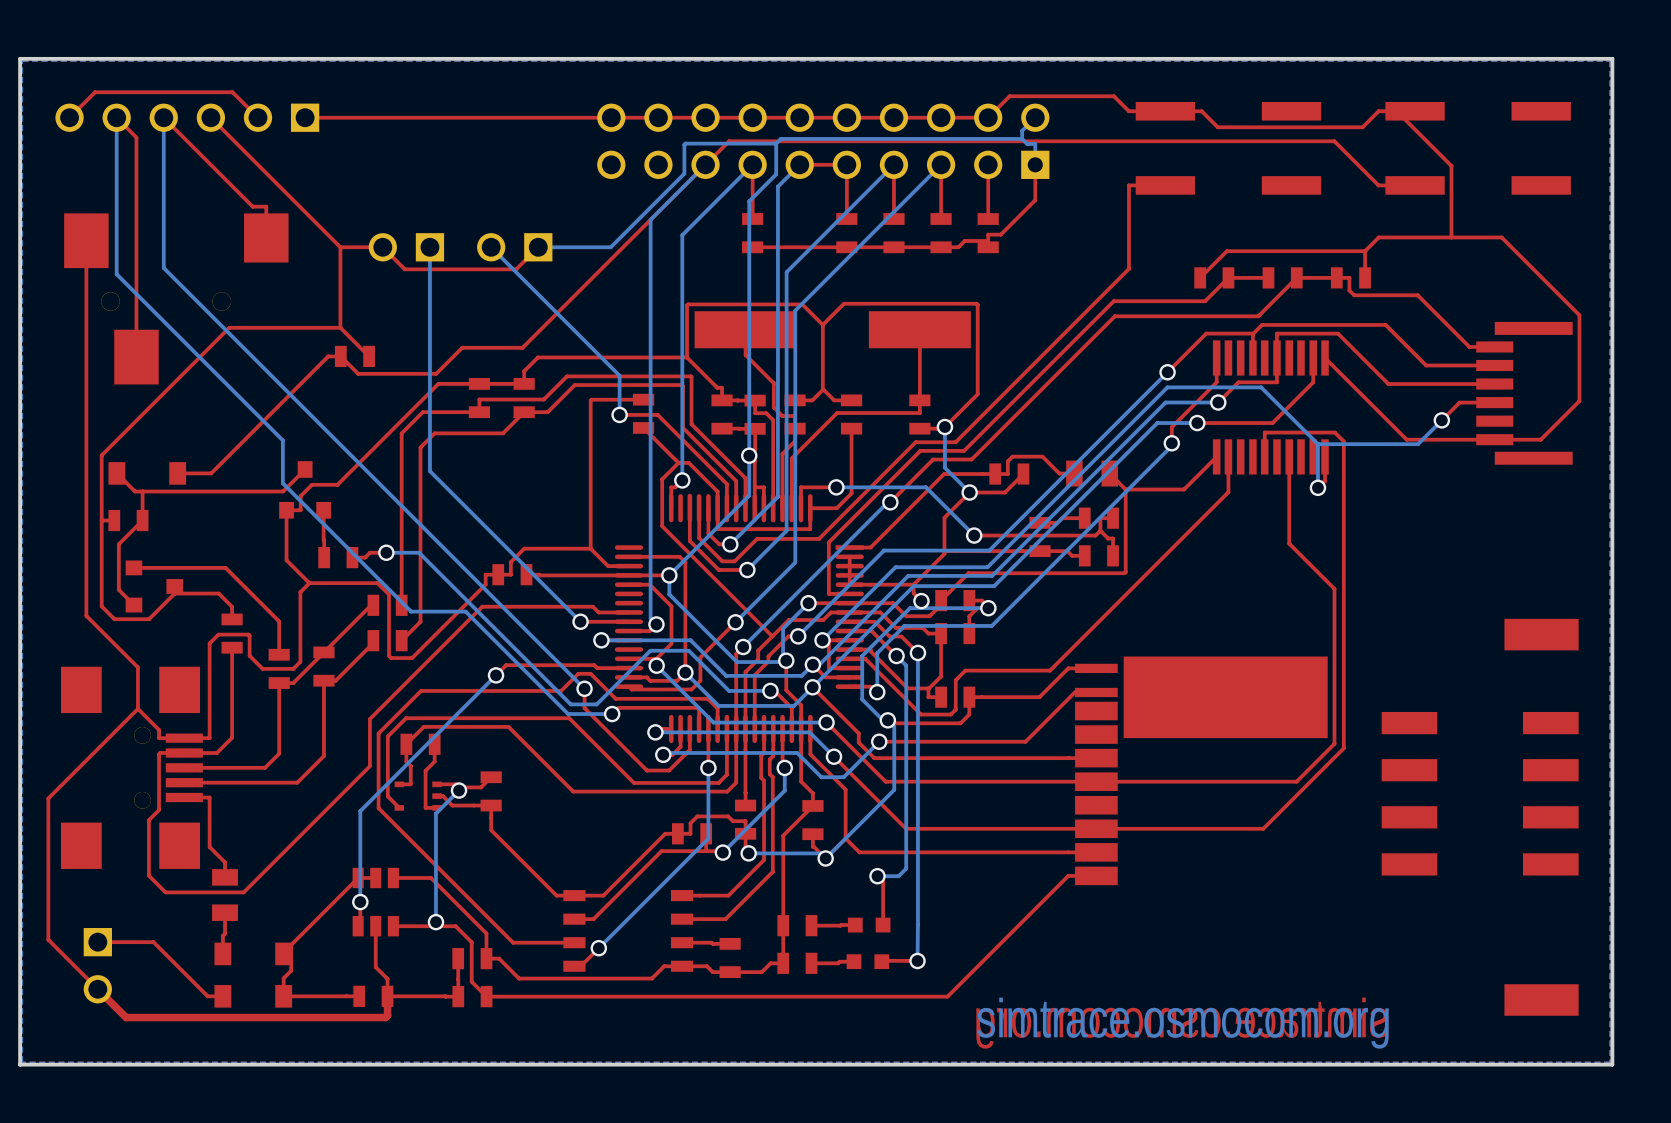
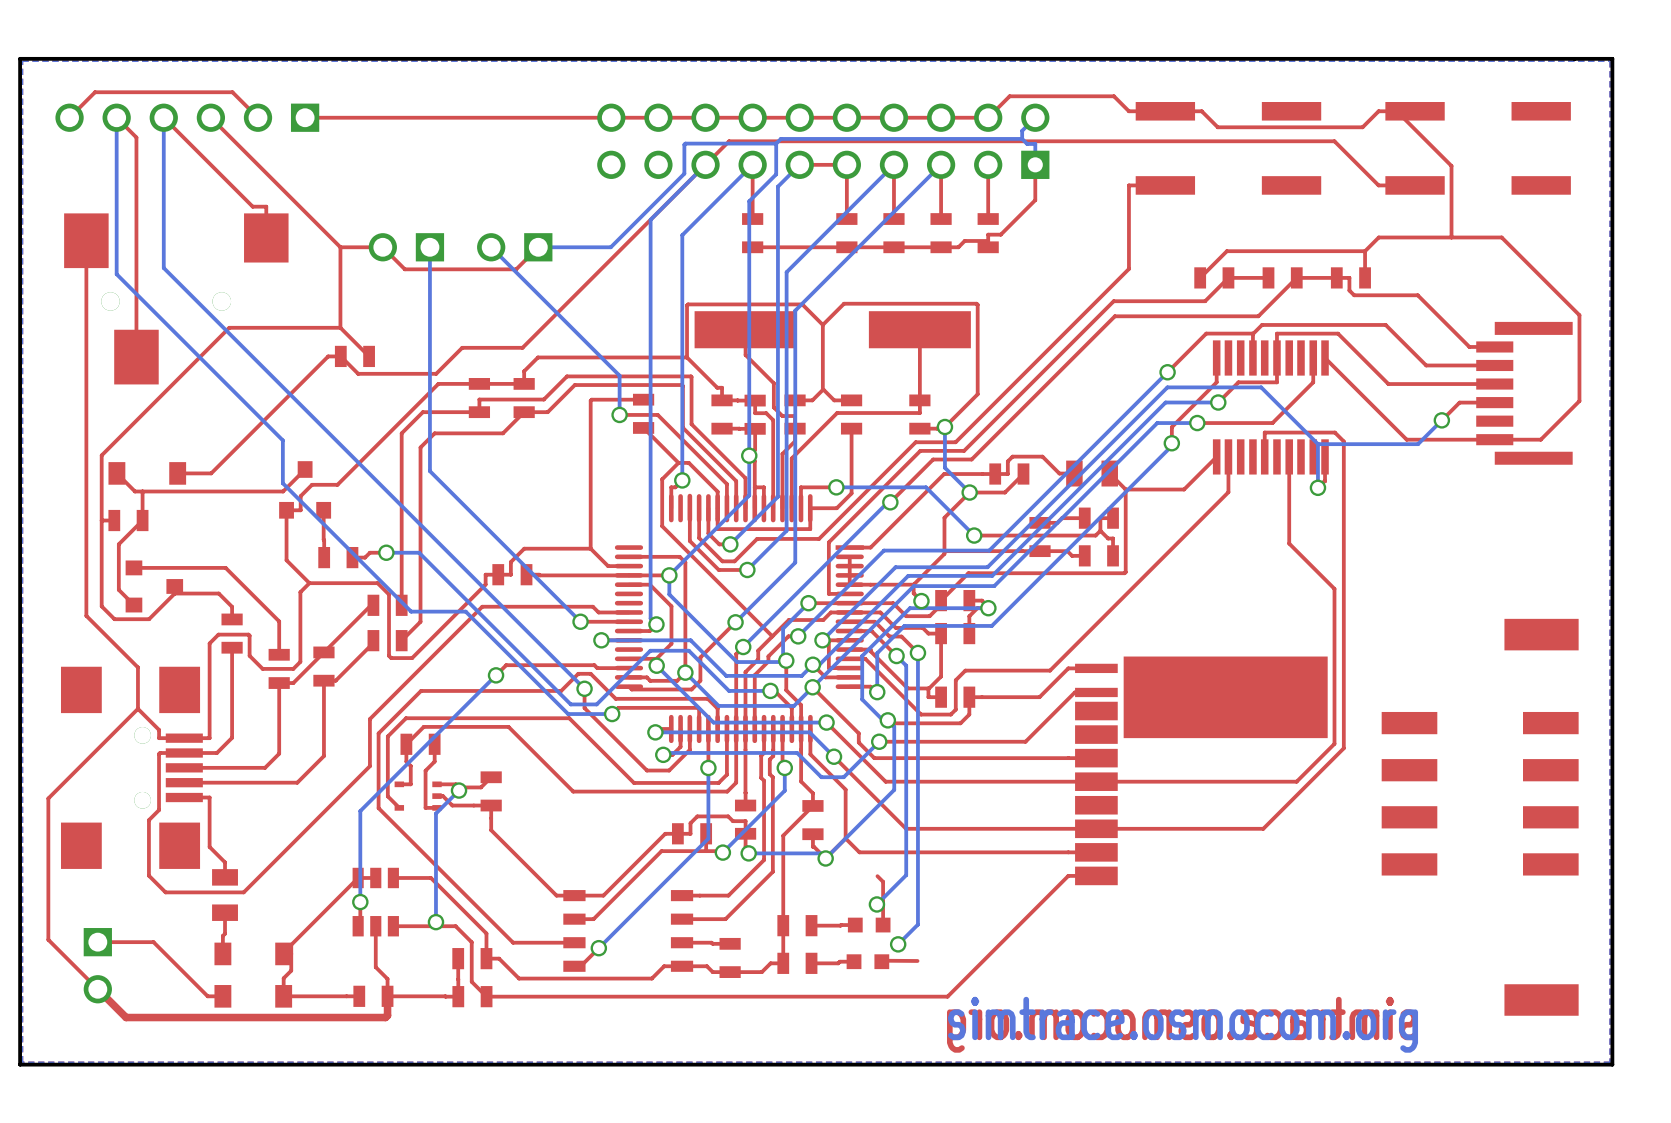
bottom track: (906, 868) (898, 876) (877, 876) -> (906, 868) (906, 875) (876, 904)
via position: (877, 876) -> (876, 904)
bottom track: (917, 924) (917, 960) -> (917, 924) (898, 944)
via position: (917, 960) -> (898, 944)

